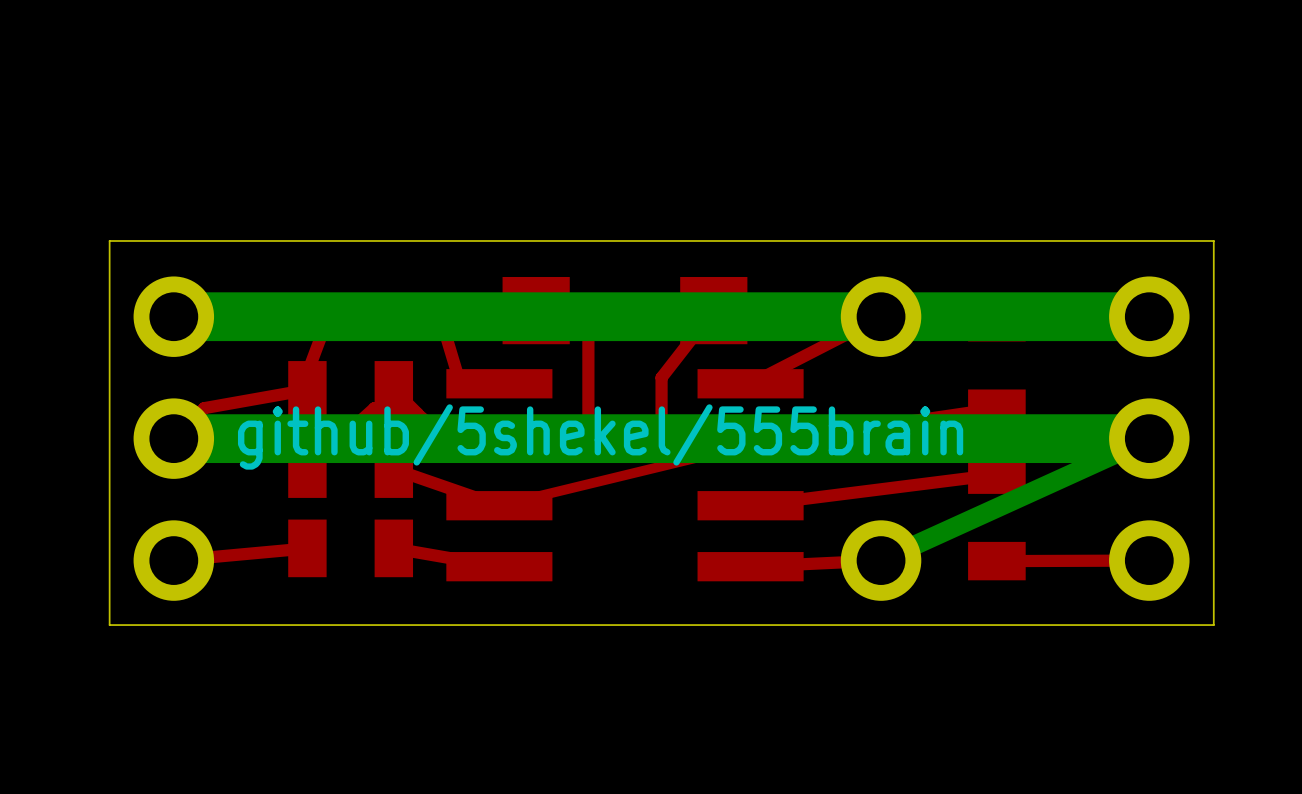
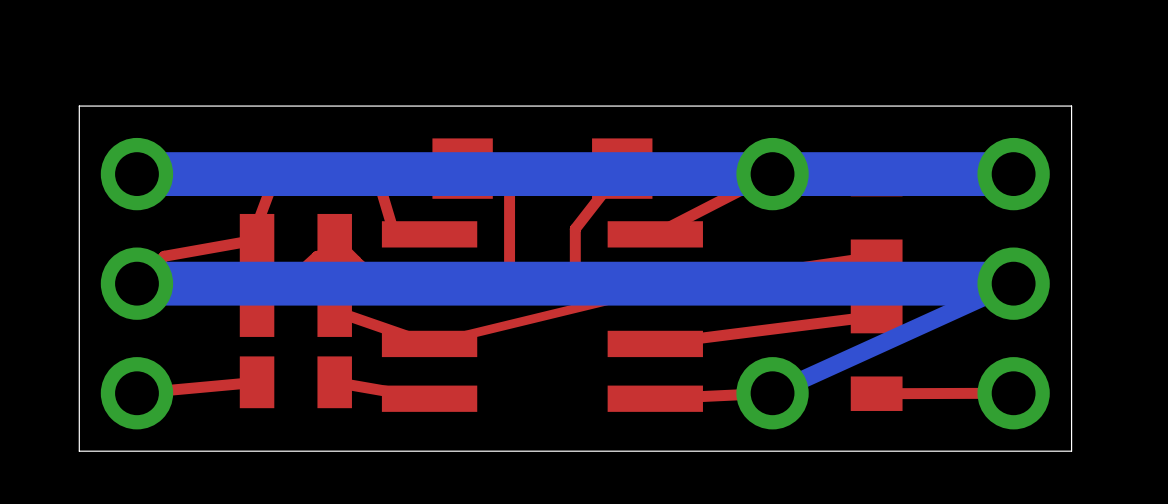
text: github/5shekel/555brain (600, 436) -> none

